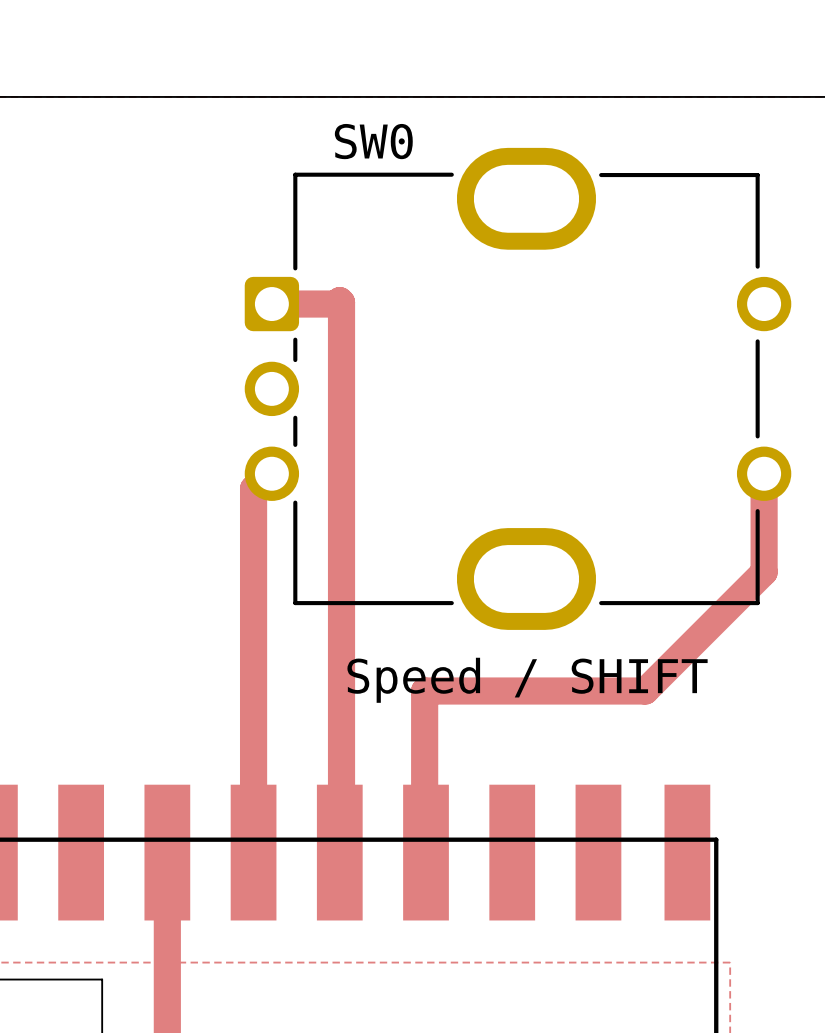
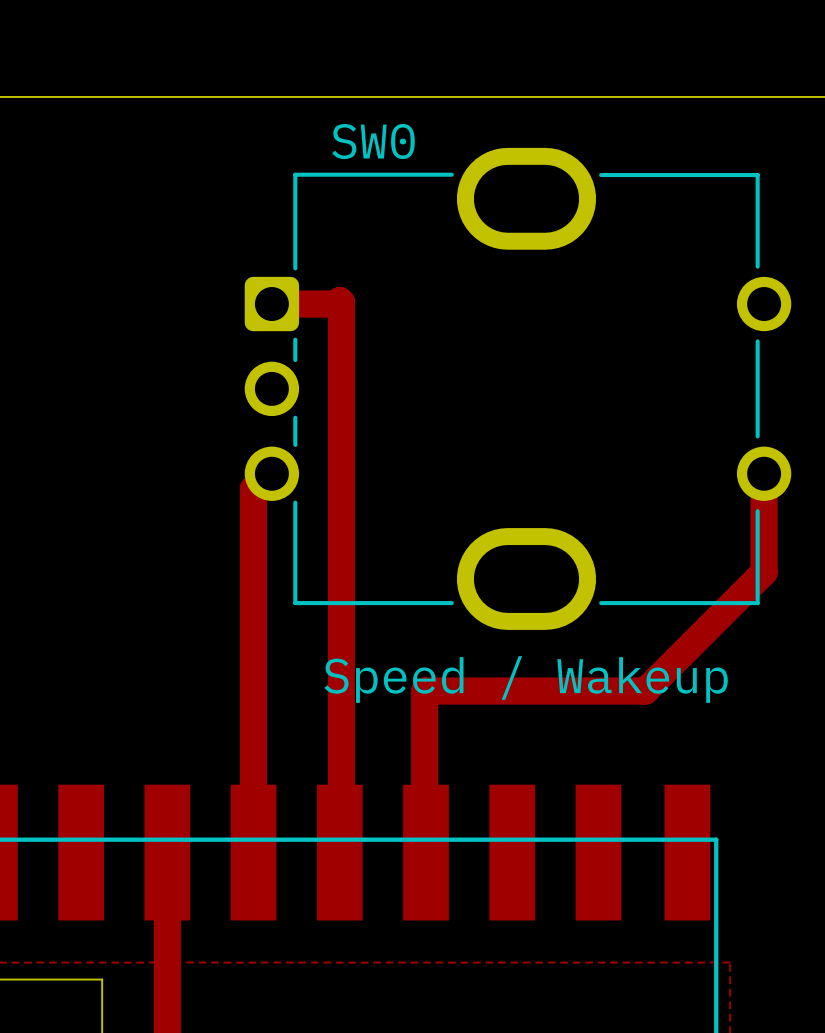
SW0 value: Speed / SHIFT (527, 680) -> Speed / Wakeup (526, 679)

